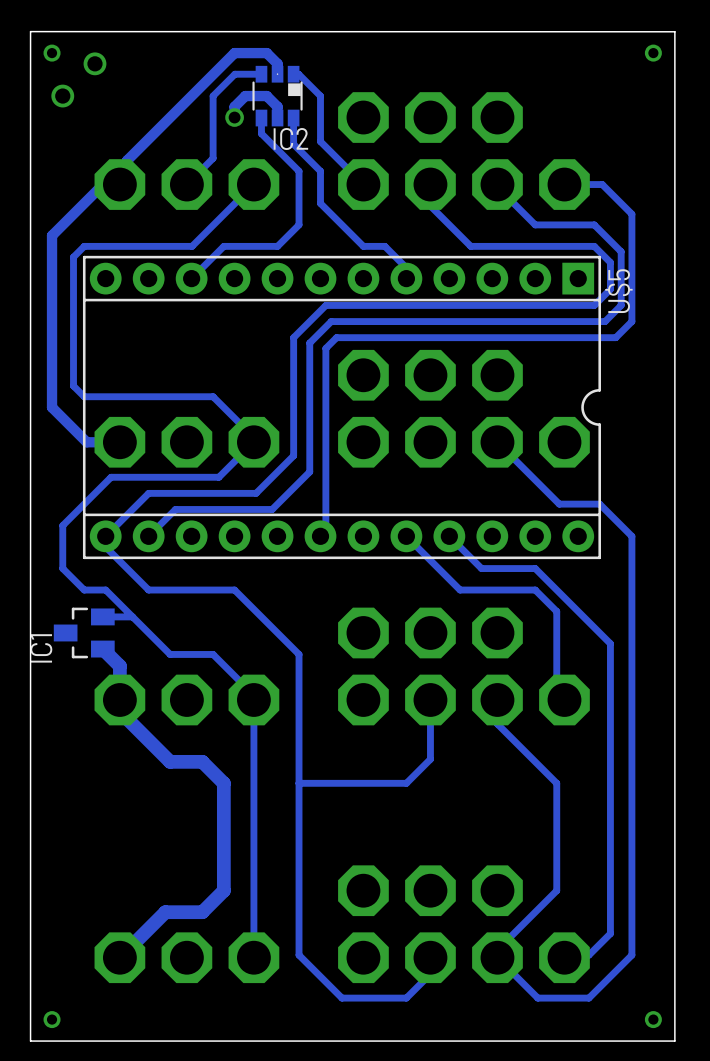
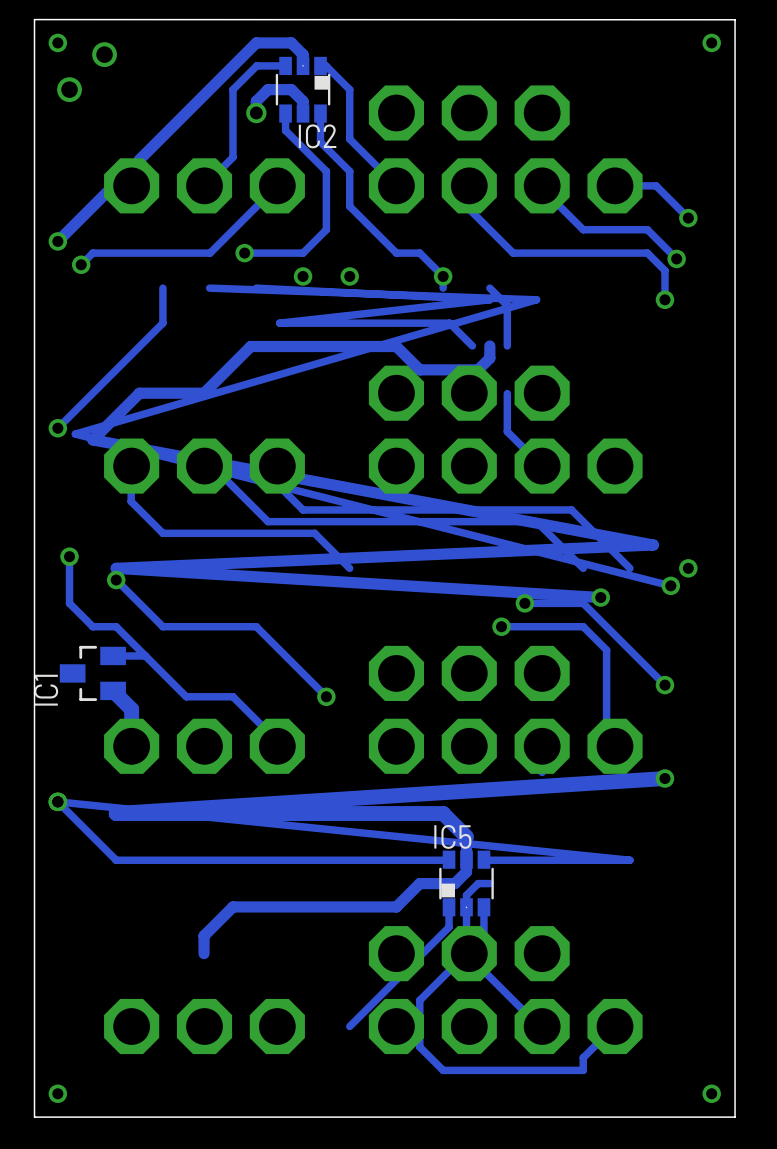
track: (631, 214) (631, 321) (615, 337) (336, 337) (325, 348) (325, 530) (320, 536) -> none
via: none -> (688, 218)
track: (52, 235) (52, 407) (86, 442) (119, 442) -> (349, 568) (314, 533) (162, 533) (131, 501) (131, 466)
via: none -> (57, 241)
track: (223, 246) (191, 278) -> (670, 585) (75, 434) (536, 299) (209, 288)
via: none -> (244, 253)
track: (621, 251) (621, 305) (605, 321) (331, 321) (309, 343) (309, 471) (272, 509) (175, 509) (148, 536) -> none
via: none -> (676, 258)
track: (73, 257) (73, 385) (84, 396) (213, 396) (253, 437) (253, 442) (218, 477) (111, 477) (62, 525) -> none
via: none -> (81, 264)
via: none -> (303, 276)
via: none -> (349, 276)
via: none -> (443, 276)
track: none -> (162, 288) (162, 323) (57, 428)
track: none -> (256, 288) (489, 299) (279, 323) (449, 323) (472, 345)
track: none -> (489, 288) (507, 305) (507, 345)
track: (610, 289) (594, 305) (325, 305) (293, 337) (293, 455) (256, 493) -> (583, 568) (536, 521) (279, 521)
via: none -> (664, 299)
track: none -> (489, 345) (489, 358) (478, 369) (419, 369) (396, 346) (250, 346) (204, 393) (139, 393) (92, 439) (653, 545) (116, 568) (600, 597)
via: none -> (57, 428)
U$5: (341, 407) -> none
track: none -> (276, 466) (276, 483) (303, 509) (571, 509) (629, 568)
track: (497, 442) (559, 504) (599, 504) (631, 536) (631, 955) (588, 998) (537, 998) (497, 957) (497, 949) (556, 890) (556, 783) (497, 724) -> (541, 466) (507, 431) (507, 393)
track: (245, 493) (148, 493) (105, 536) (105, 547) -> (268, 521) (212, 466) (204, 466)
via: none -> (69, 556)
track: (406, 536) (460, 590) -> none
track: (449, 536) (481, 568) -> none
via: none -> (688, 568)
via: none -> (116, 580)
via: none -> (670, 585)
via: none -> (600, 597)
via: none -> (524, 603)
via: none -> (501, 626)
track: (610, 643) (610, 933) (588, 955) (567, 955) (564, 957) -> (489, 883) (478, 883) (466, 895) (466, 953) (419, 1000) (419, 1047) (443, 1070) (583, 1070) (583, 1057) (614, 1026)
via: none -> (664, 685)
track: (299, 654) (299, 955) (341, 998) (406, 998) (430, 974) (430, 957) -> none
via: none -> (326, 696)
track: (253, 699) (253, 957) -> none
track: (430, 699) (430, 759) (406, 783) (299, 783) -> none
track: (119, 711) (170, 761) -> (664, 778) (116, 813) (186, 813)
via: none -> (664, 778)
via: none -> (57, 801)
track: (202, 761) (223, 783) (223, 890) (202, 912) (165, 912) (119, 957) -> (221, 813) (443, 813) (466, 836) (466, 871) (454, 883) (419, 883) (396, 906) (232, 906) (204, 935) (204, 953)
track: none -> (483, 859) (629, 860) (57, 801) (116, 860) (449, 859)
IC5: none -> (466, 883)
track: none -> (449, 907) (449, 927) (349, 1026)
track: none -> (483, 907) (483, 971) (536, 1023) (541, 1026)

